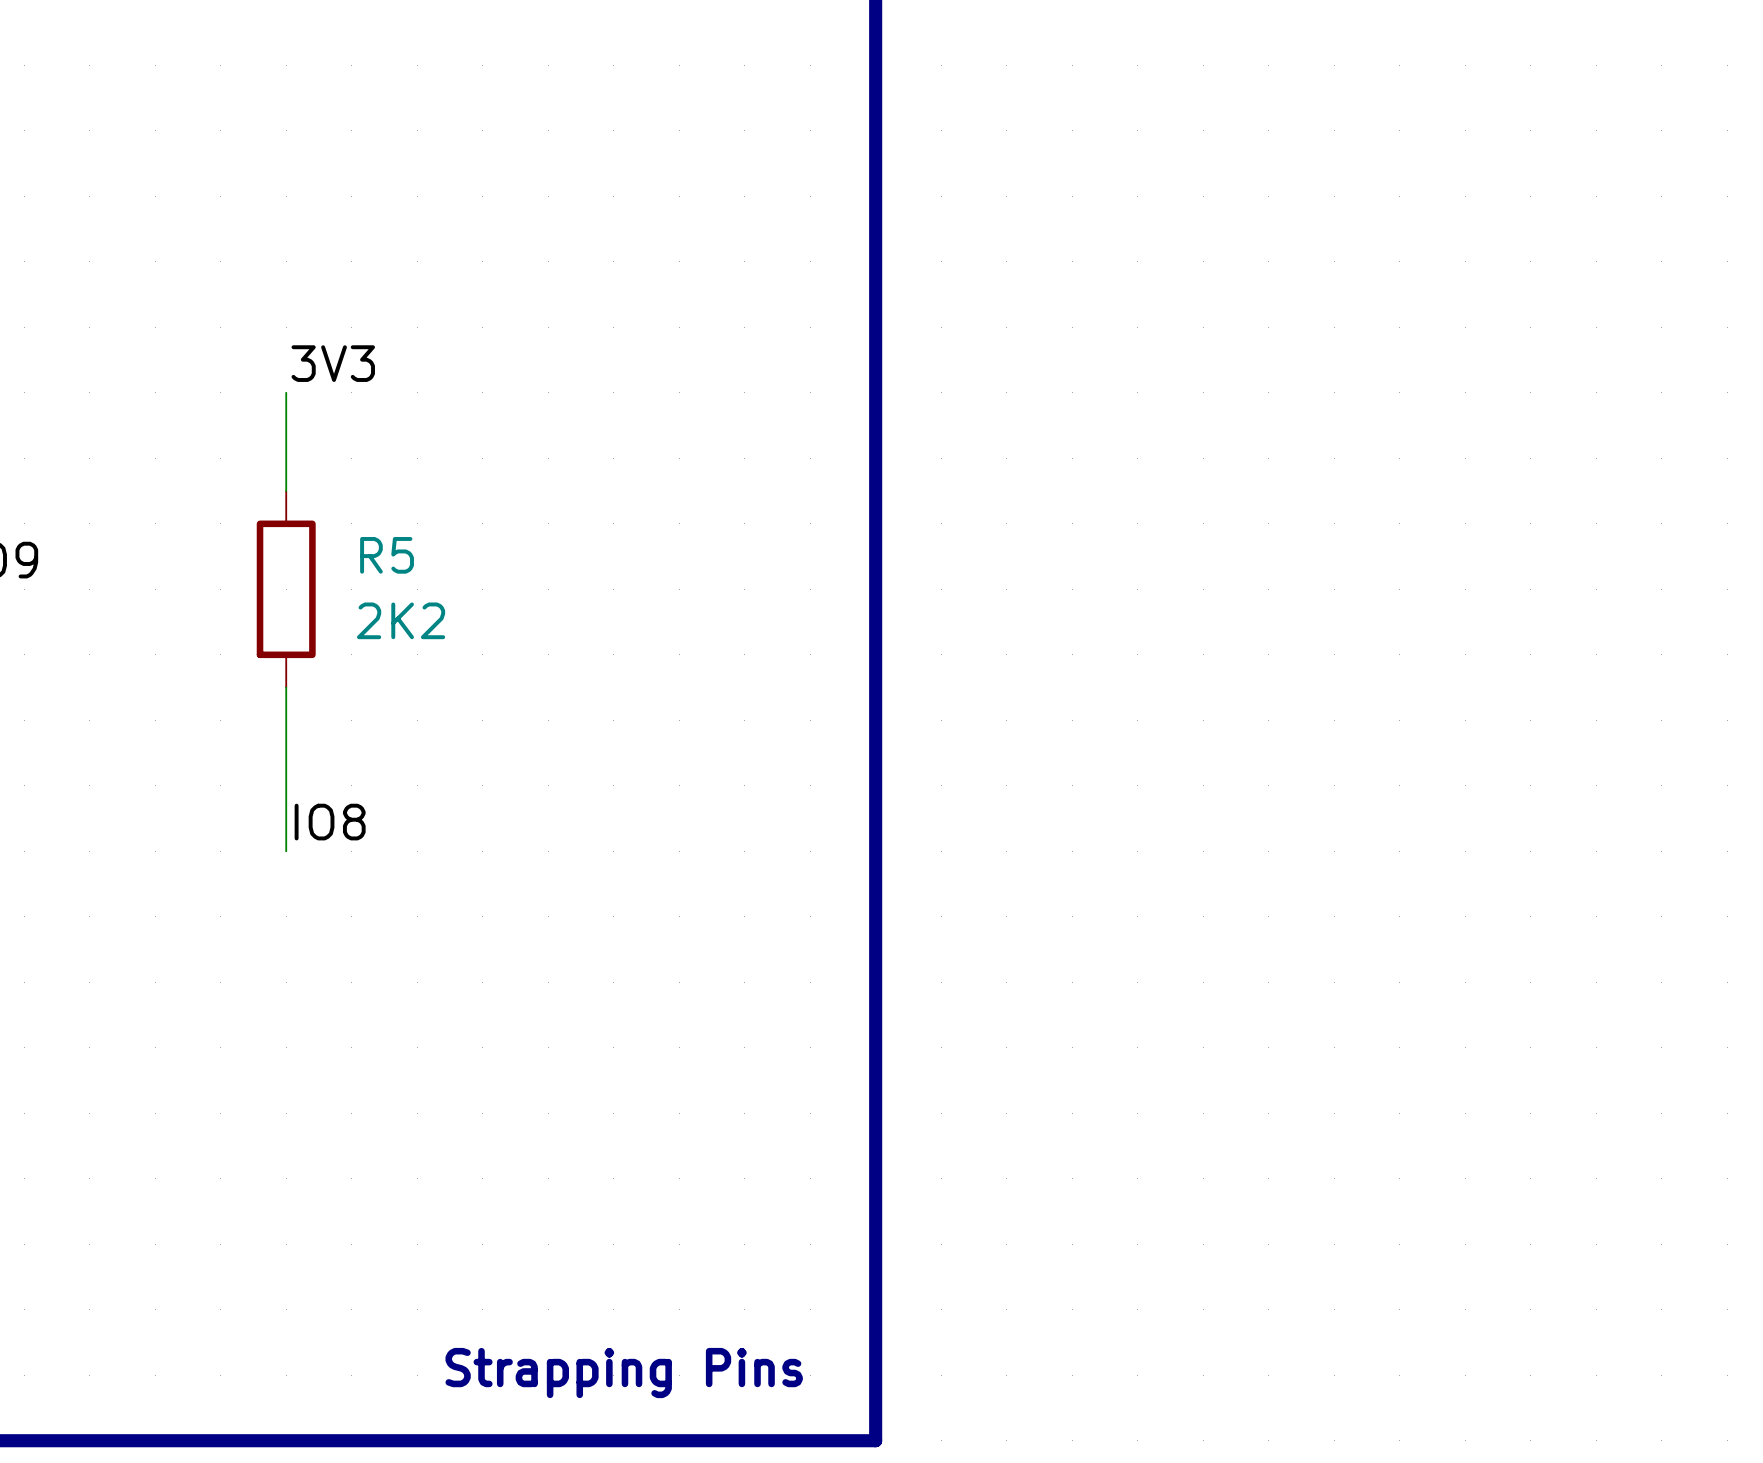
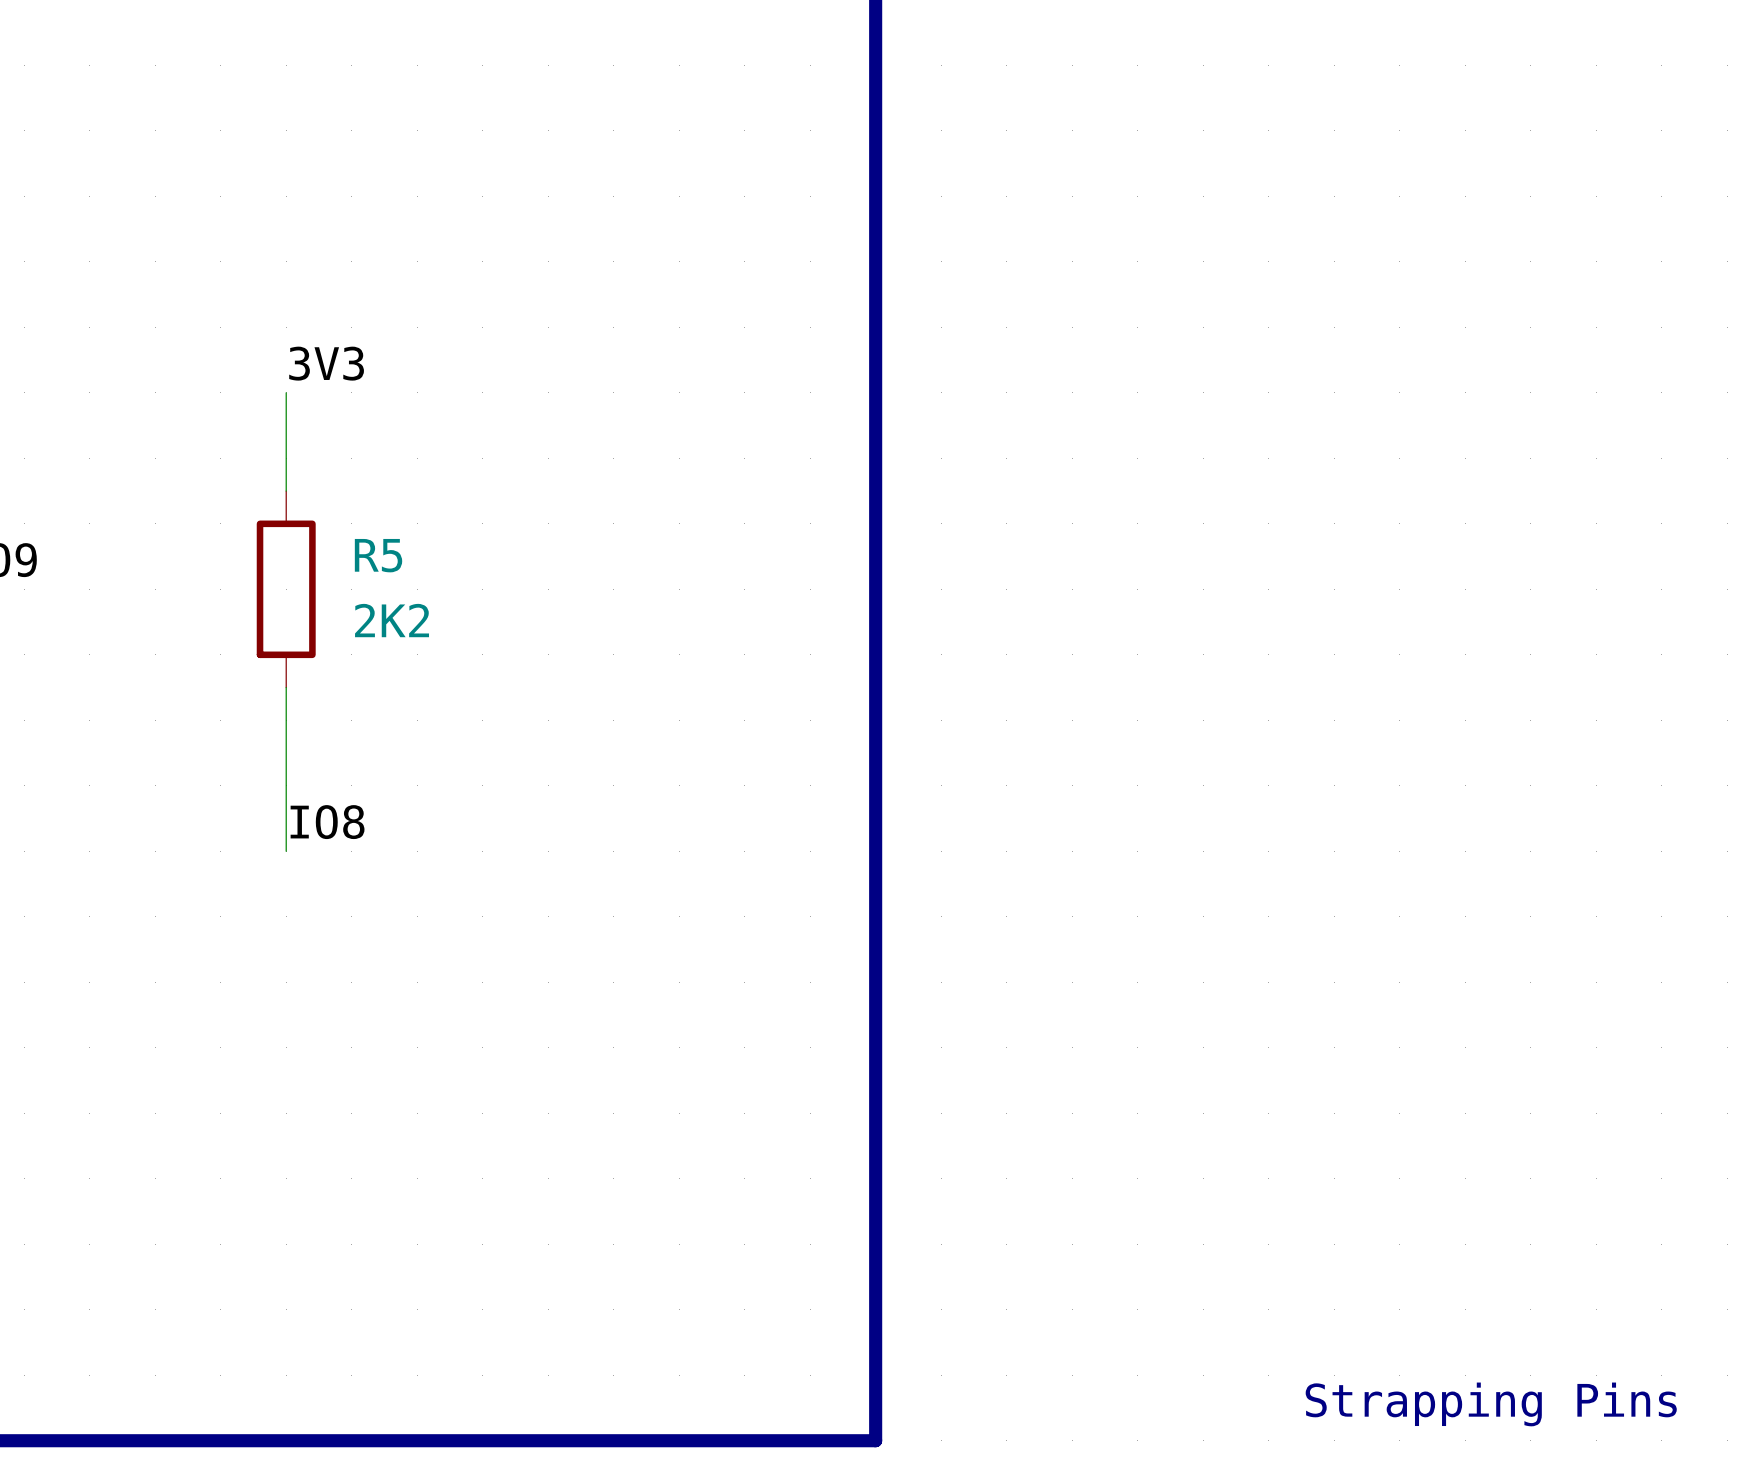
text: Strapping Pins (624, 1373) -> none
text: none -> Strapping Pins (1491, 1404)

